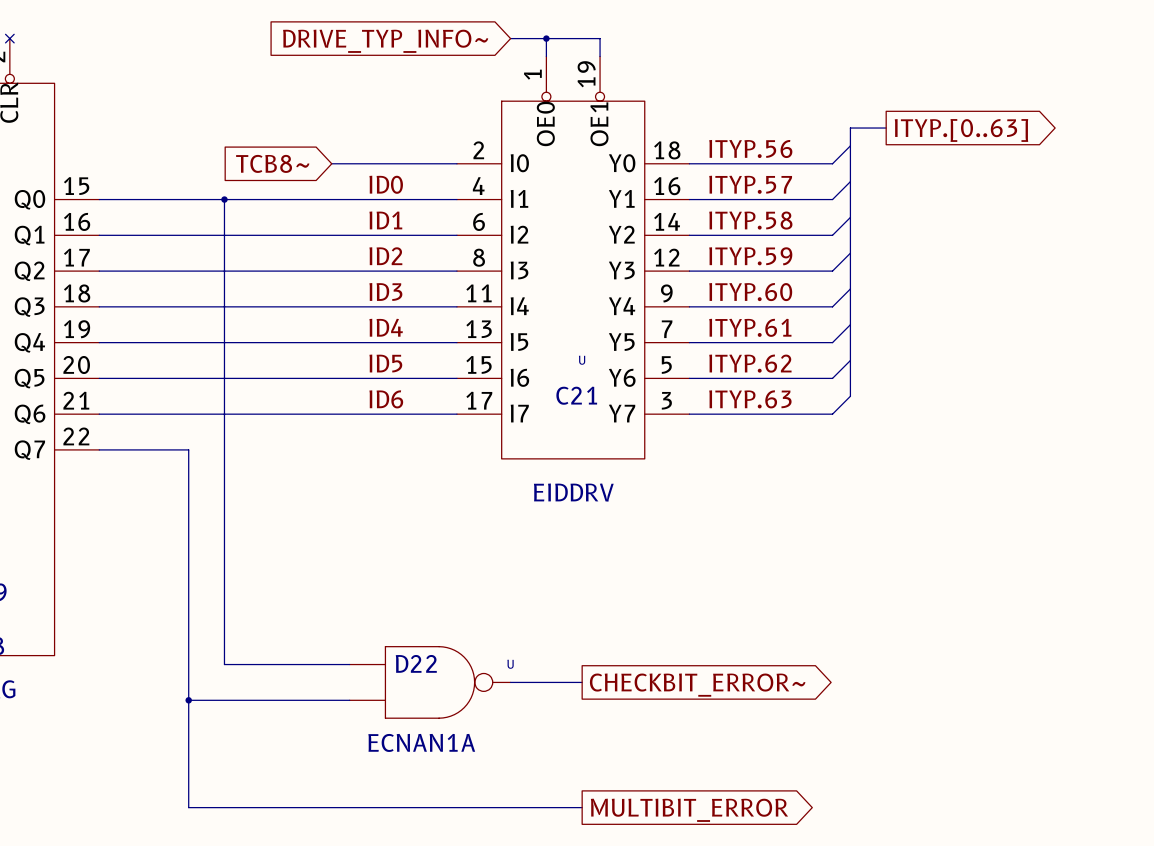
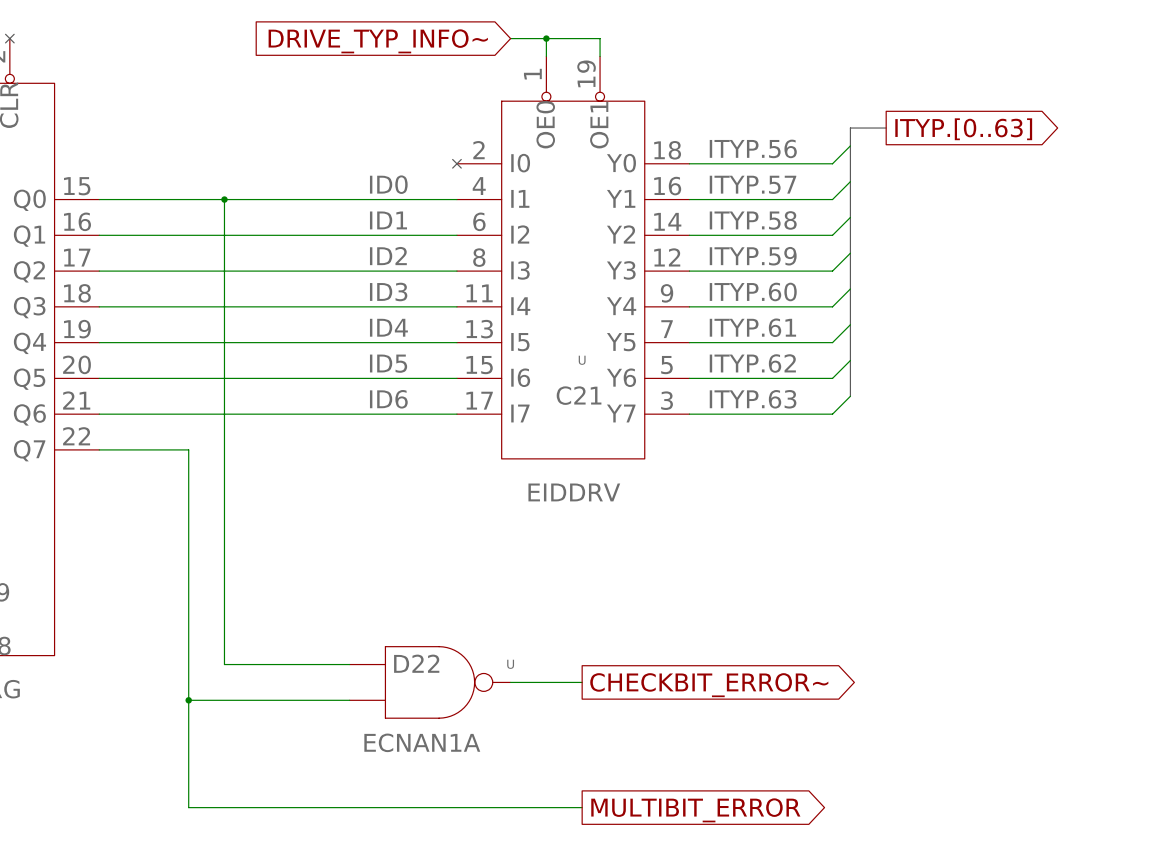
global label: TCB8~ (272, 163) -> none
wire: (331, 163) (456, 163) -> none
no-connect mark: none -> (456, 163)

